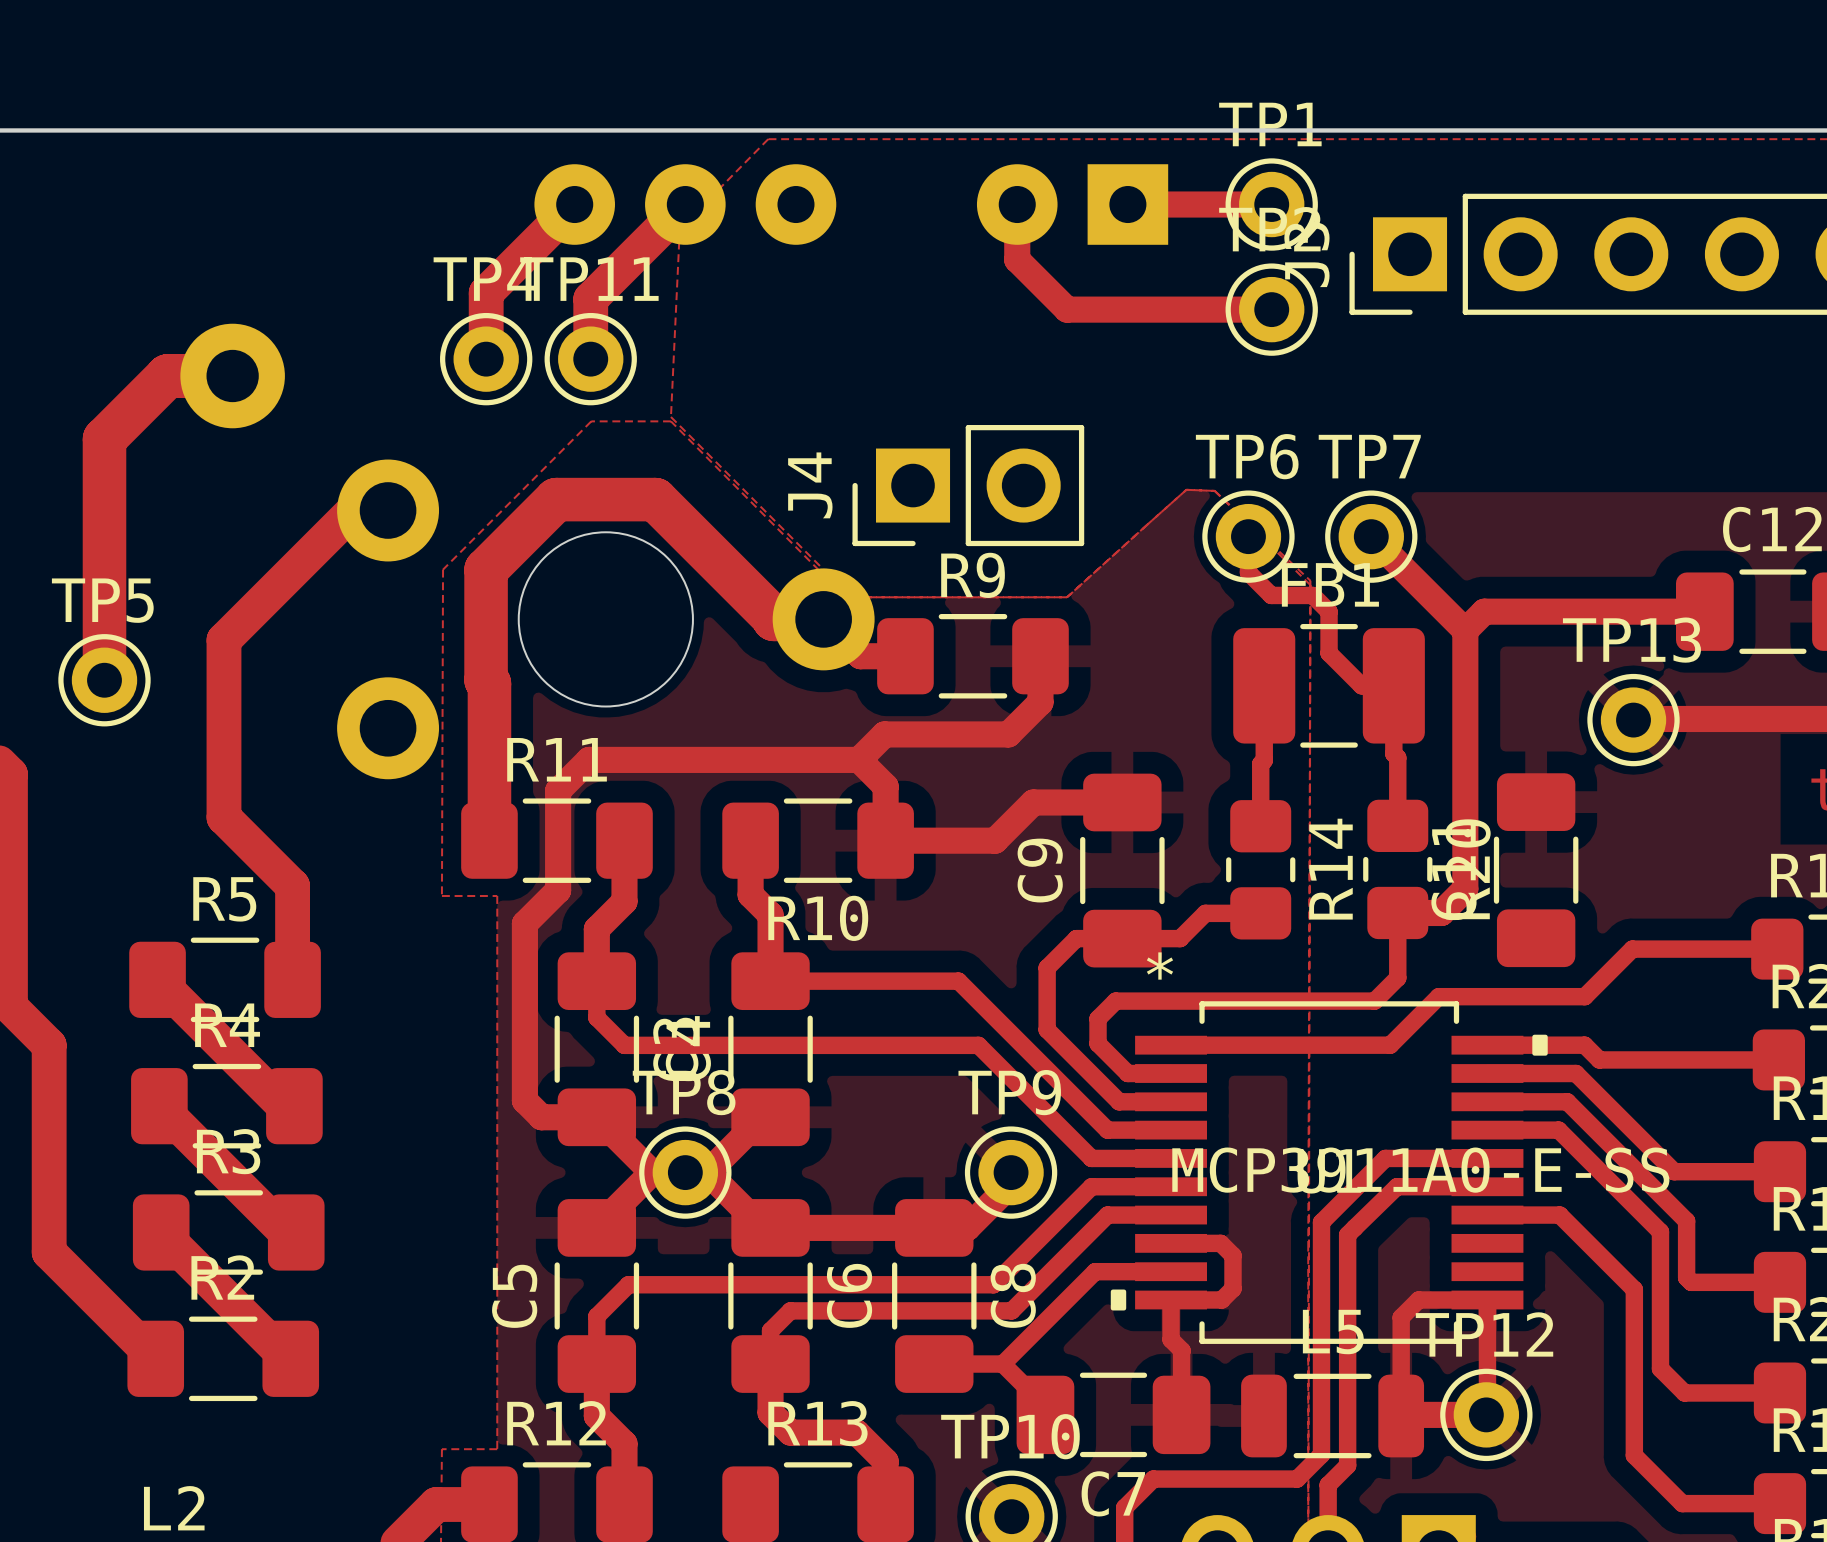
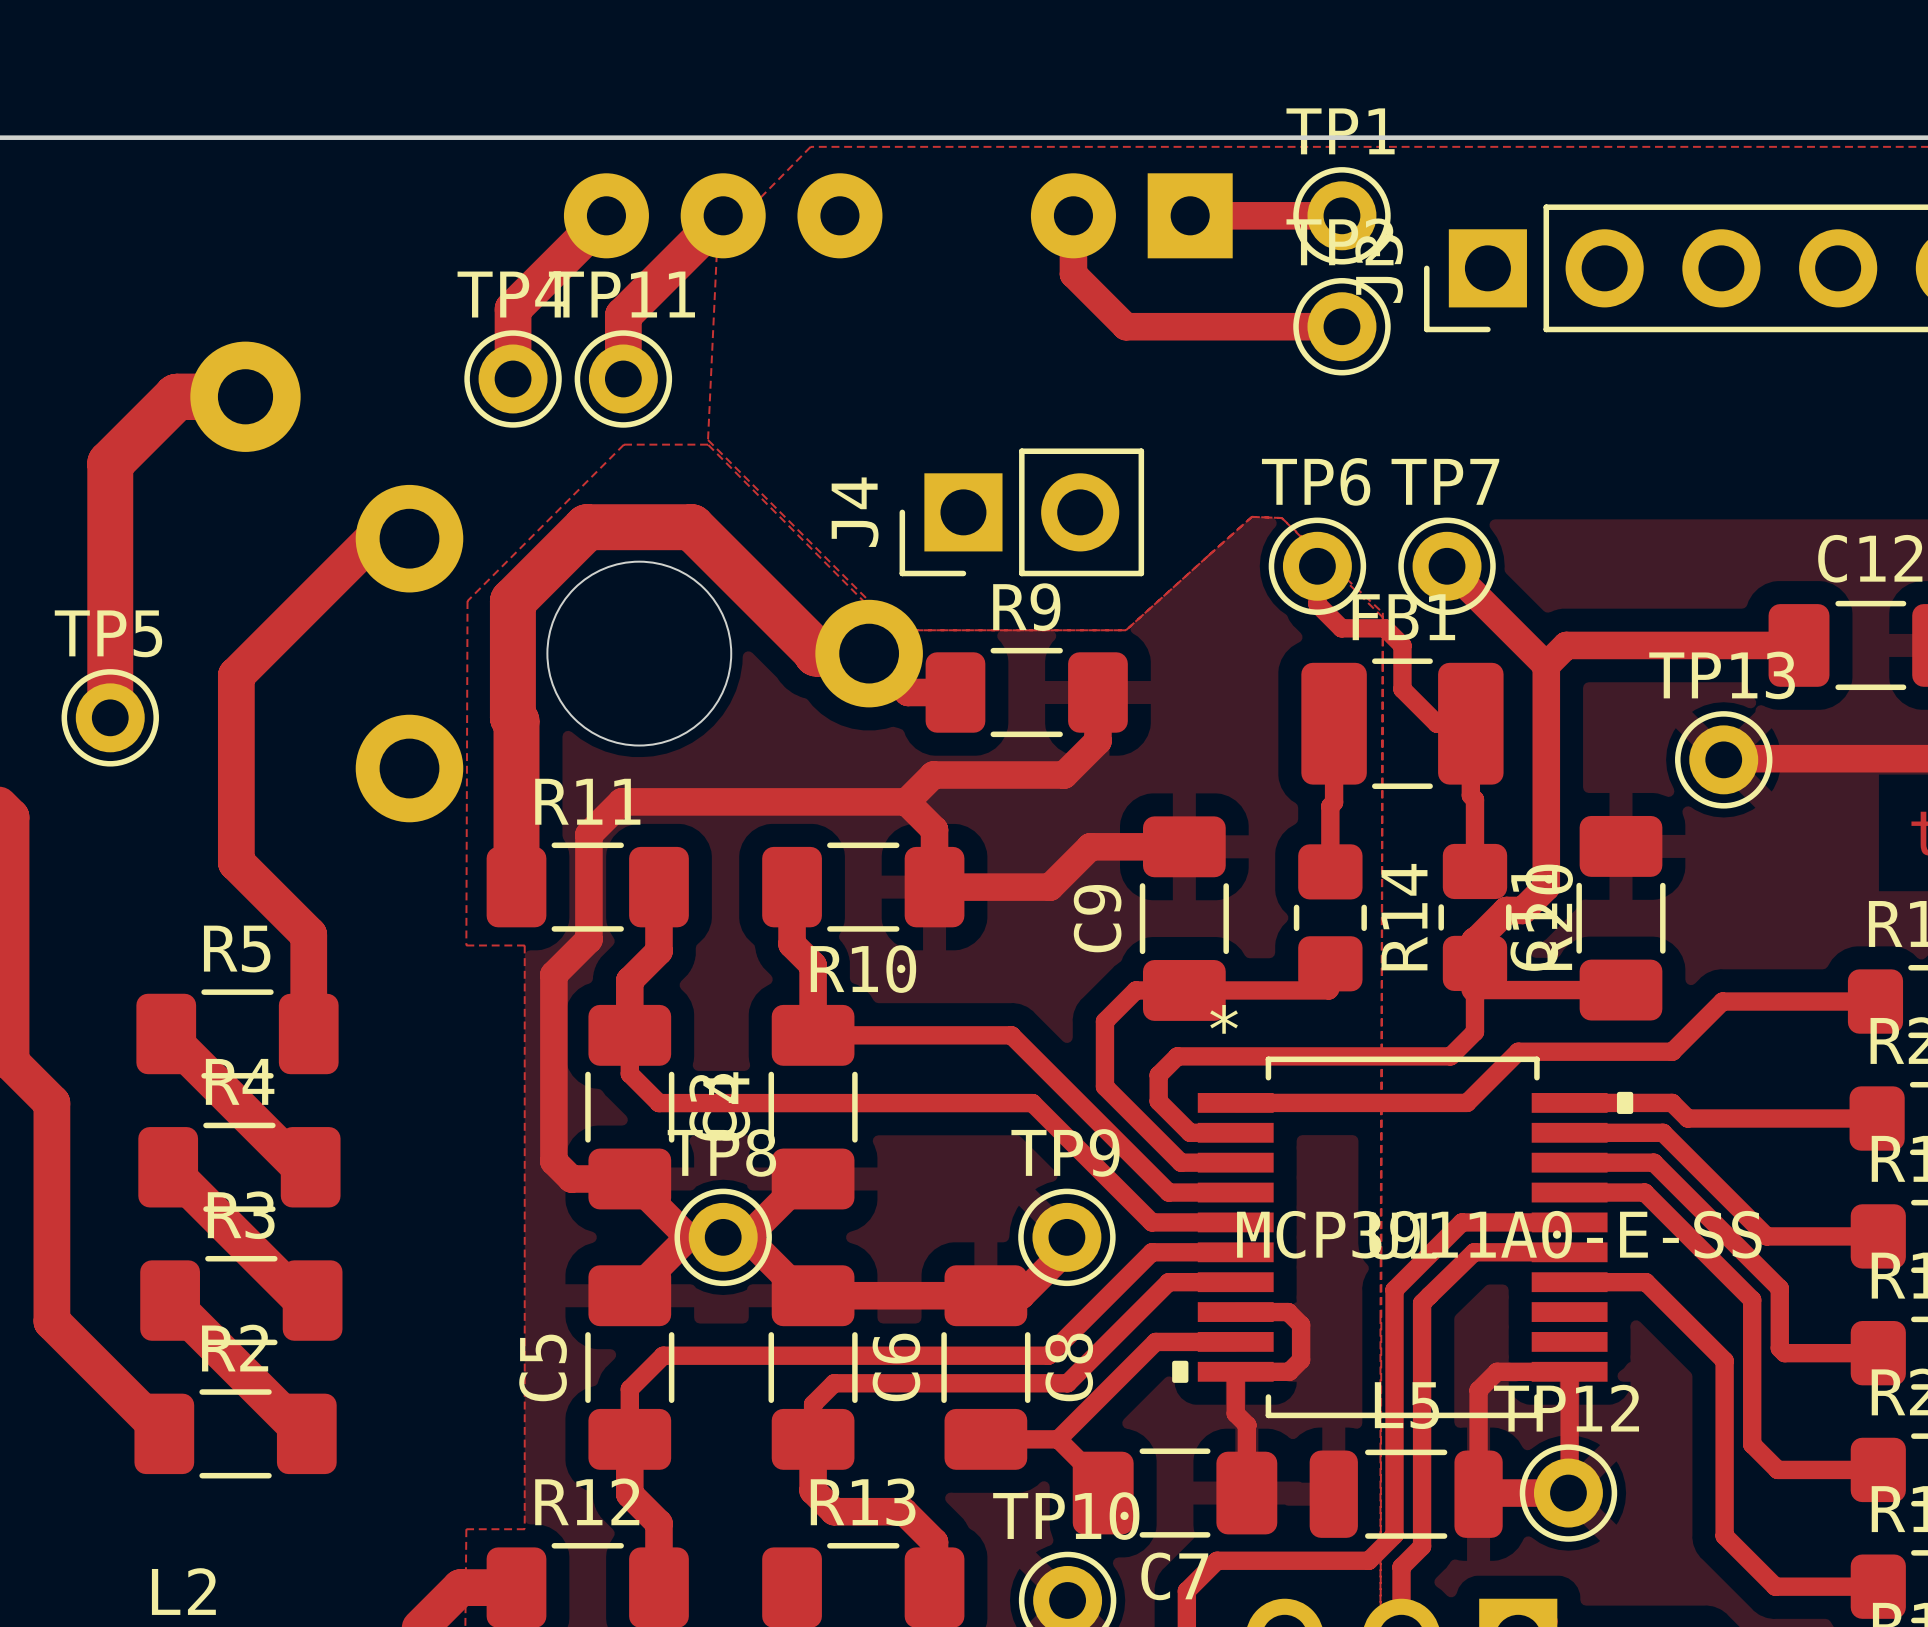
track: (1465, 840) (1465, 889) (1441, 912) (1397, 912) -> (1546, 887) (1522, 910) (1506, 910) (1474, 940) (1474, 963)
track: (1260, 913) (1205, 913) (1180, 938) -> (1330, 989) (1245, 990)
track: none -> (1474, 988) (1620, 990)

